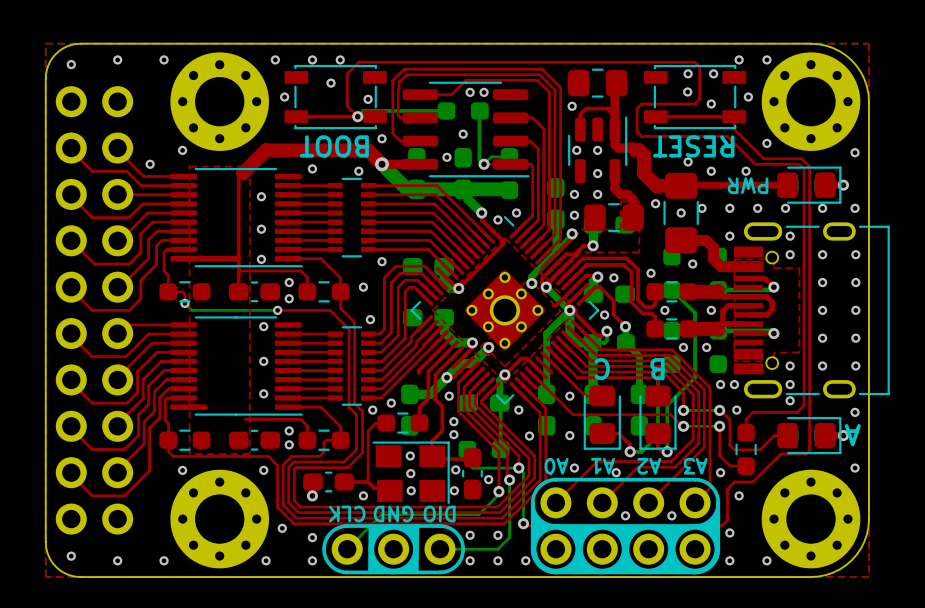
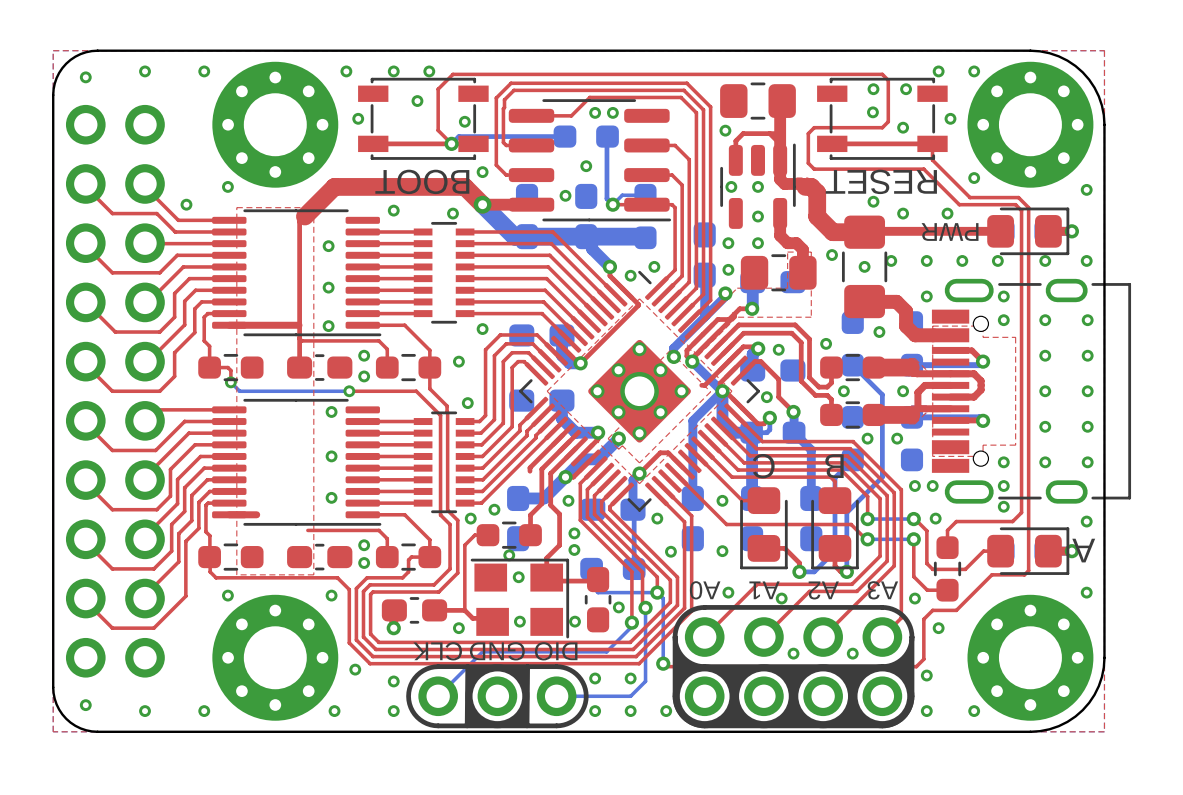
via: none -> (509, 555)
via: (455, 469) -> none
via: (410, 473) -> none

